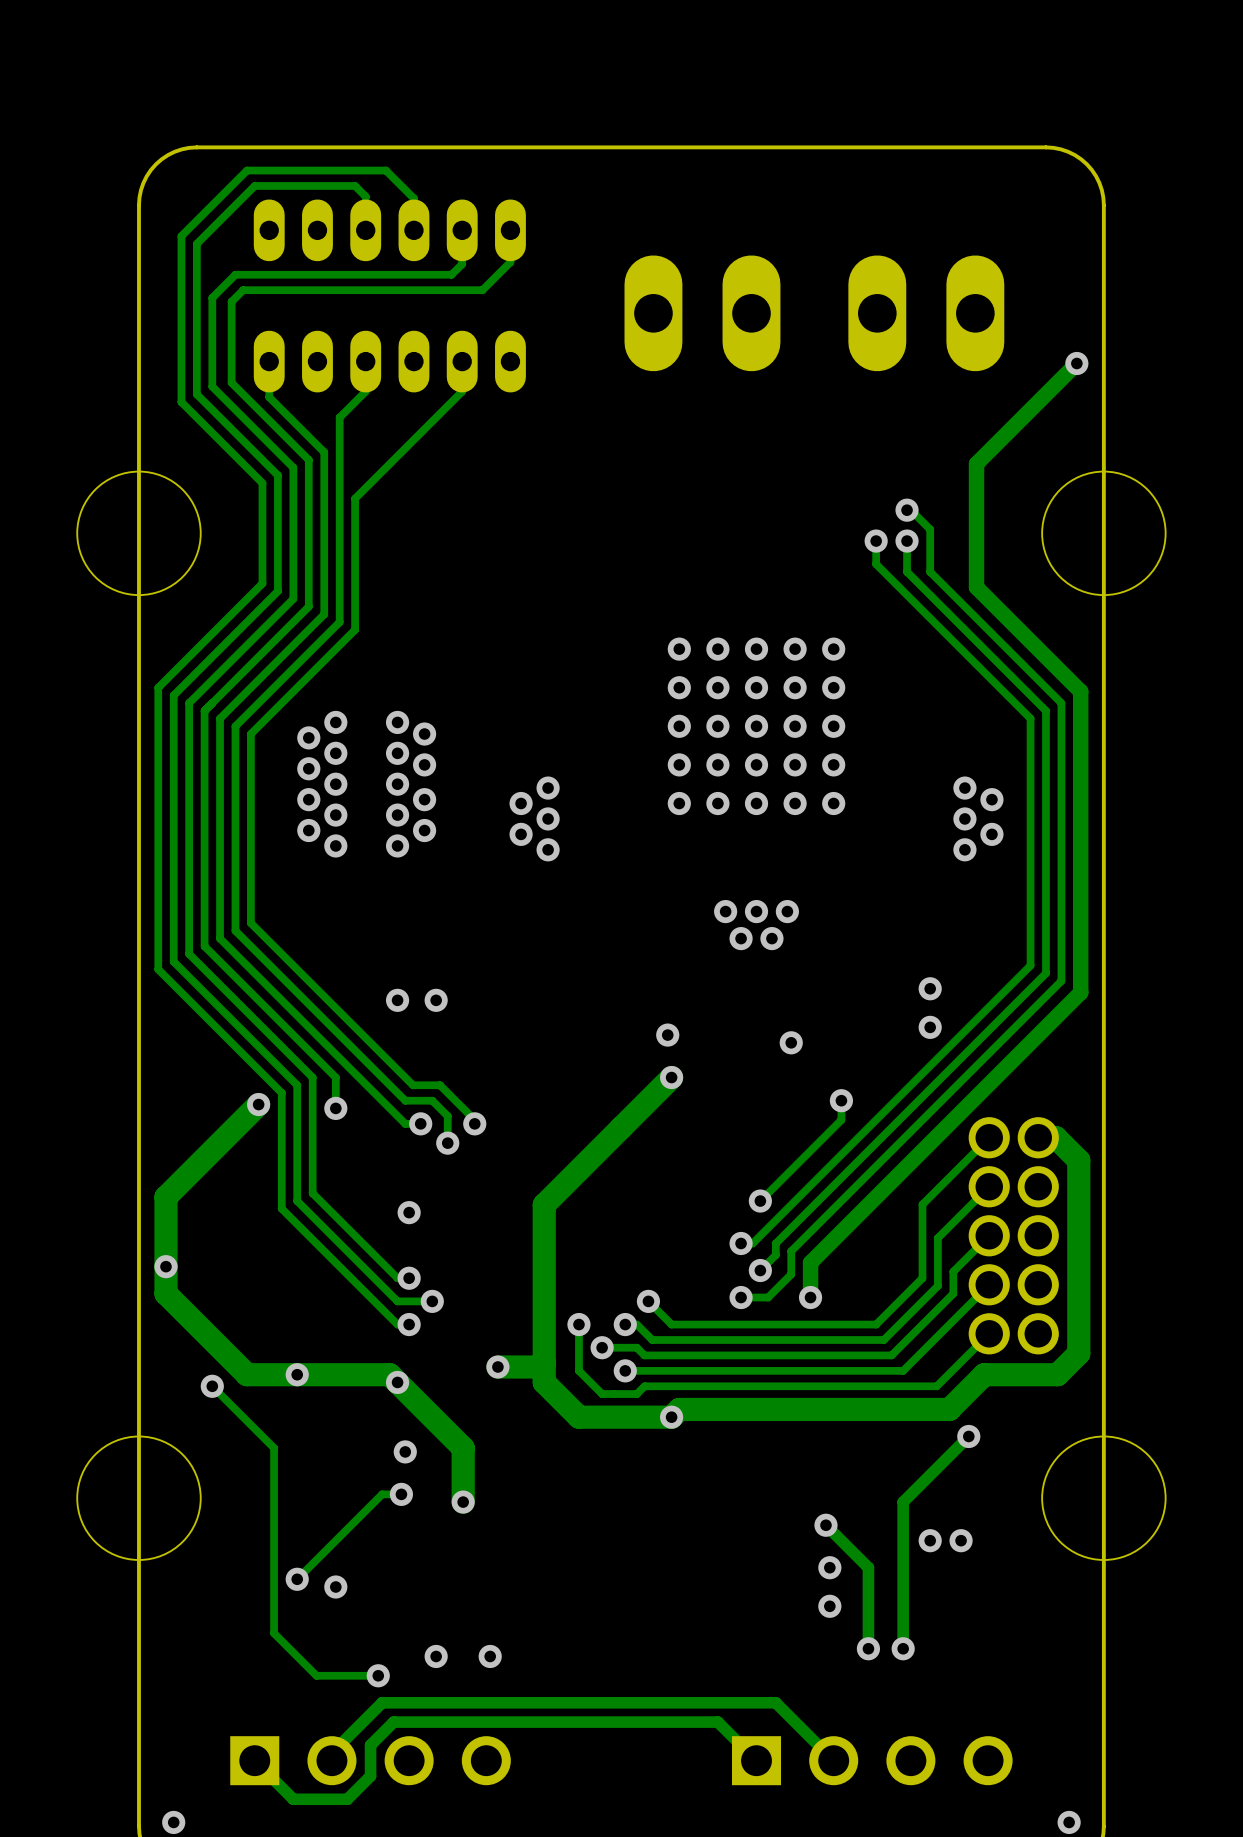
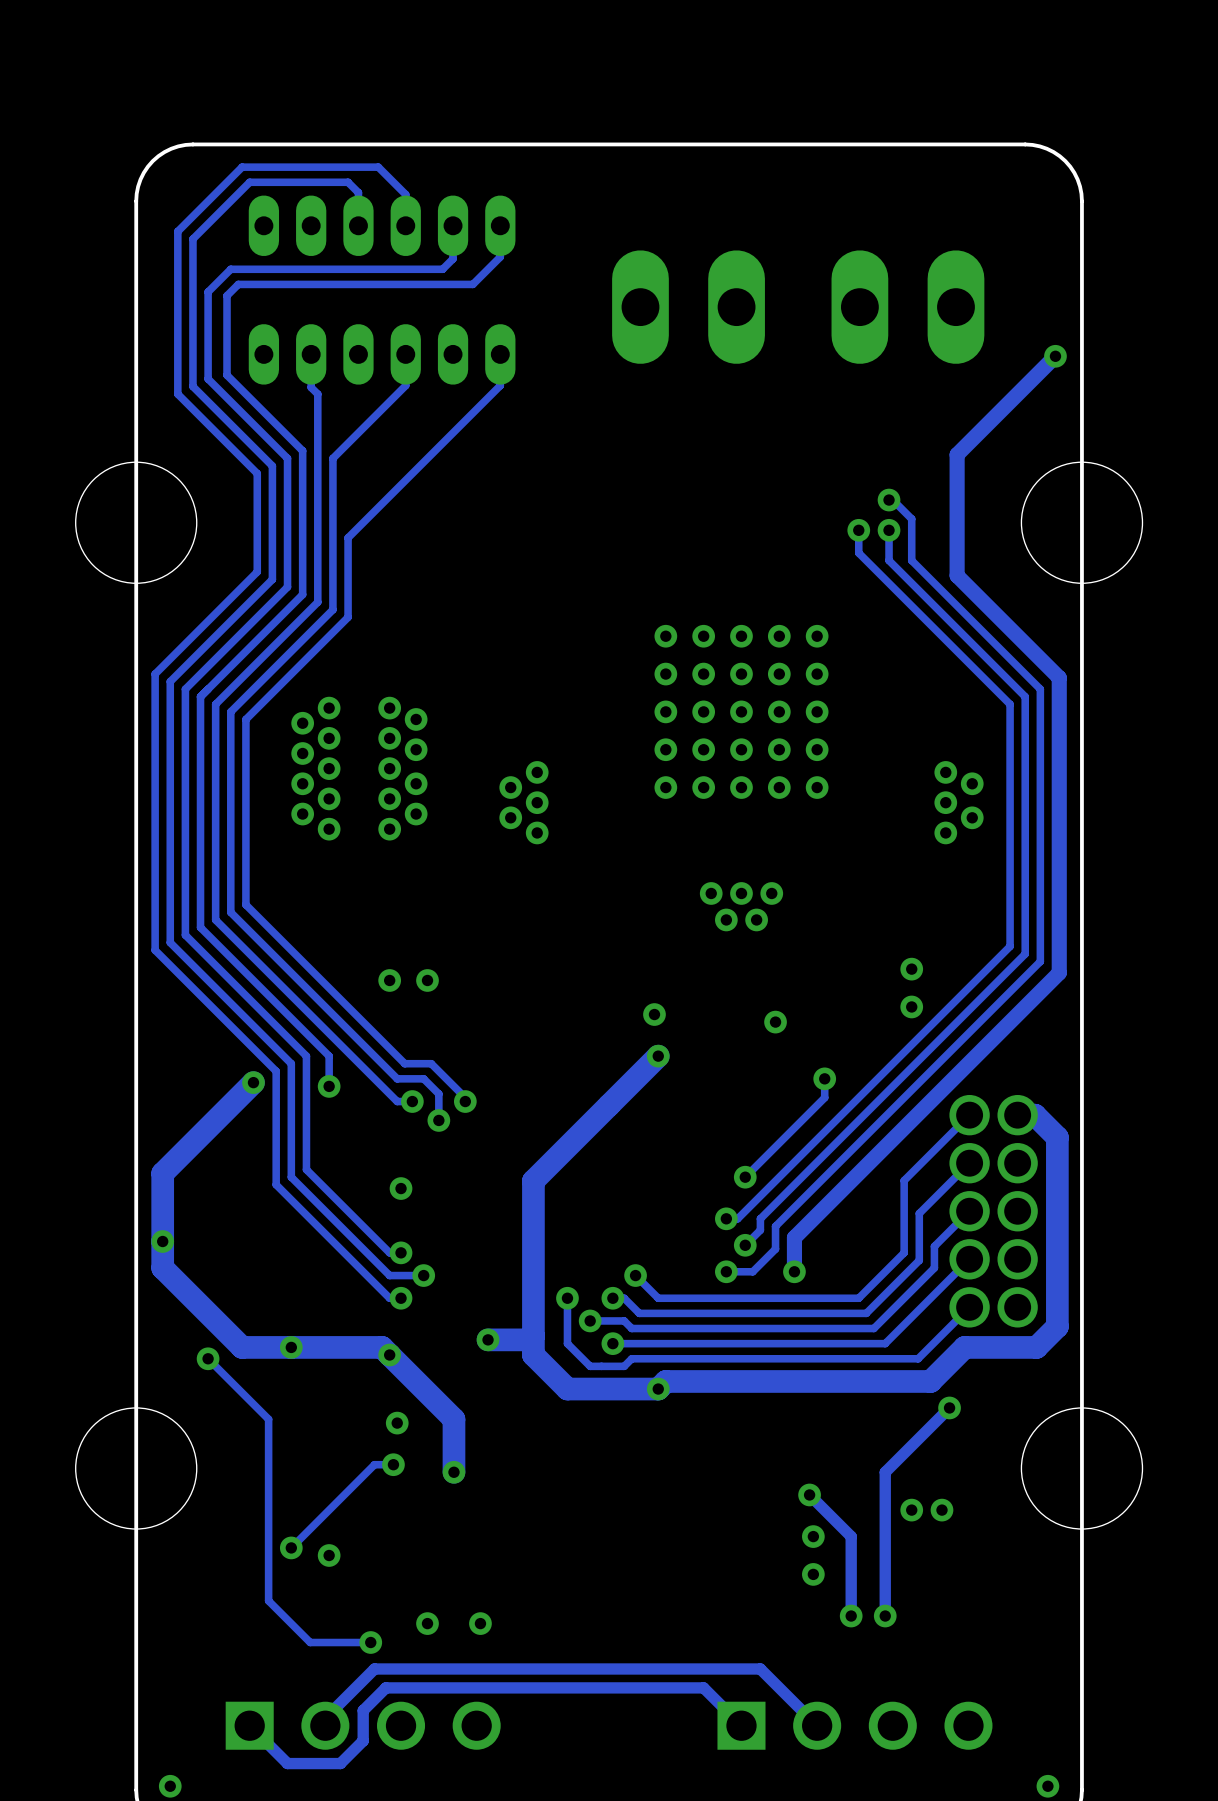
track: (269, 361) (269, 397) (324, 452) -> (311, 354) (311, 387) (317, 394) (317, 443)
track: (365, 361) (365, 391) (339, 417) (339, 467) -> (405, 354) (405, 385) (332, 458)
track: (462, 361) (462, 391) (355, 498) (355, 548) -> (500, 354) (500, 385) (348, 537)

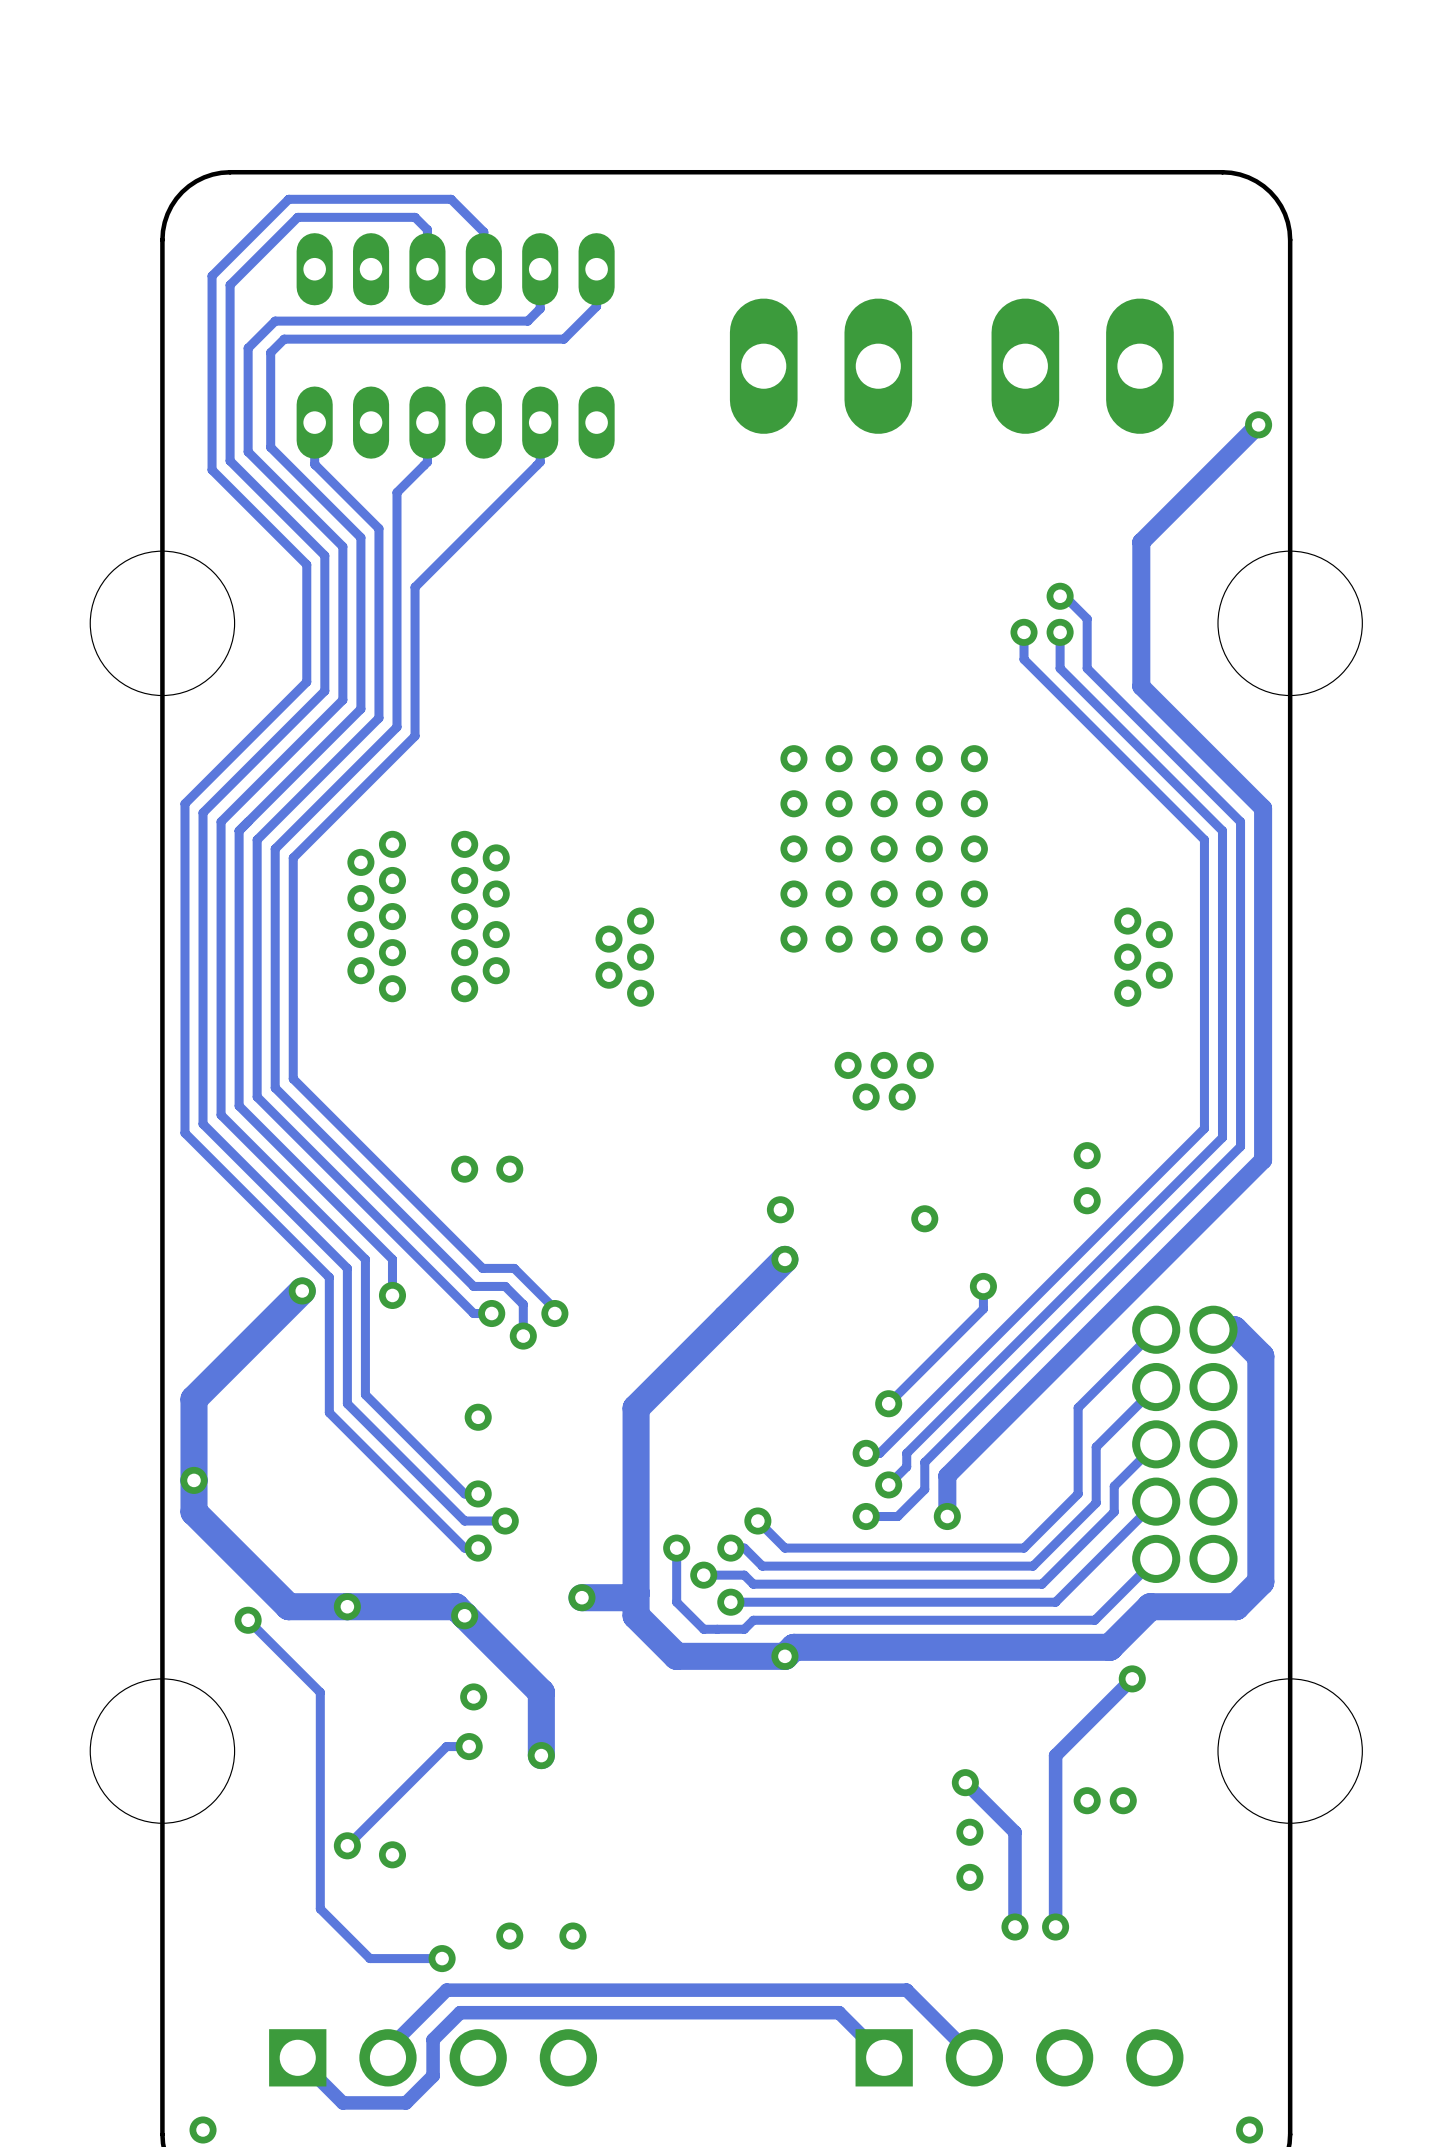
track: (311, 354) (311, 387) (317, 394) (317, 443) -> (314, 422) (314, 464) (378, 528)
track: (405, 354) (405, 385) (332, 458) -> (427, 422) (427, 462) (396, 492) (396, 546)
track: (500, 354) (500, 385) (348, 537) -> (540, 422) (540, 462) (415, 587) (415, 641)

